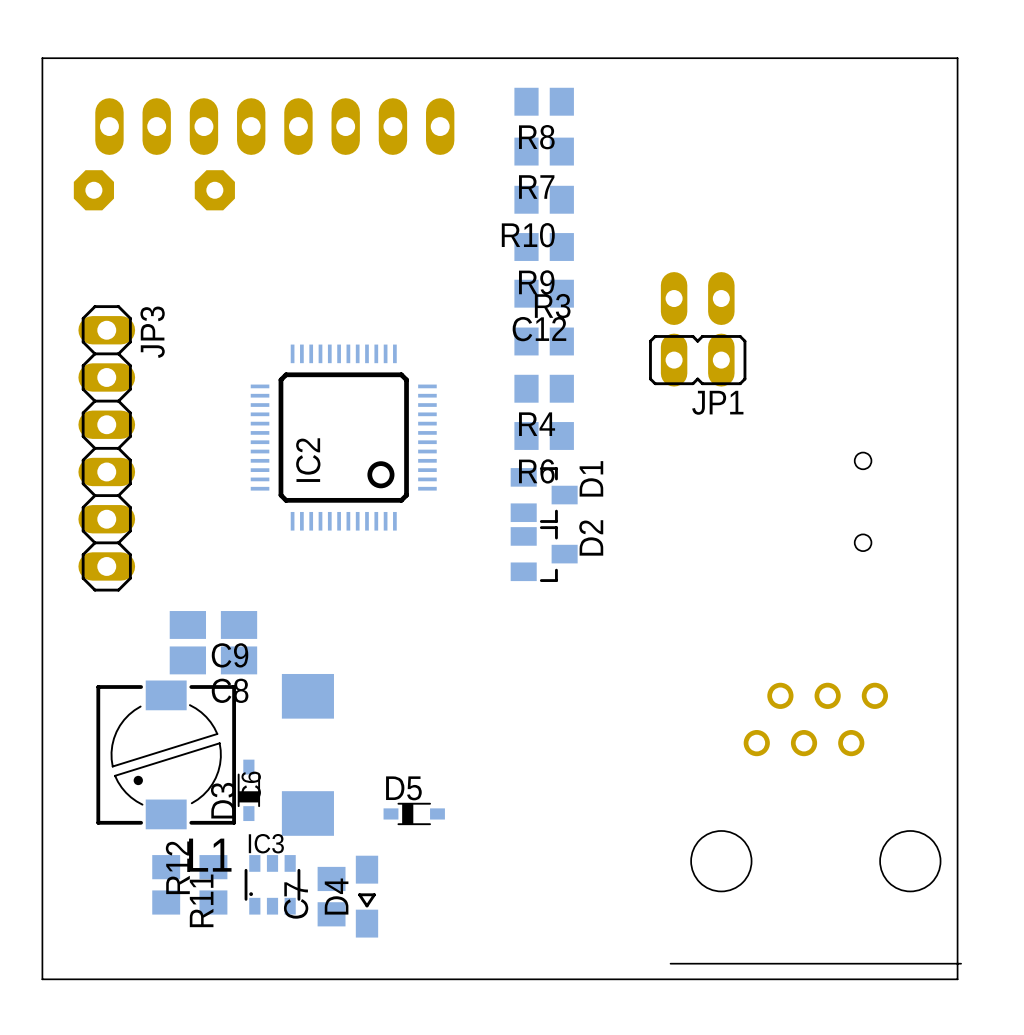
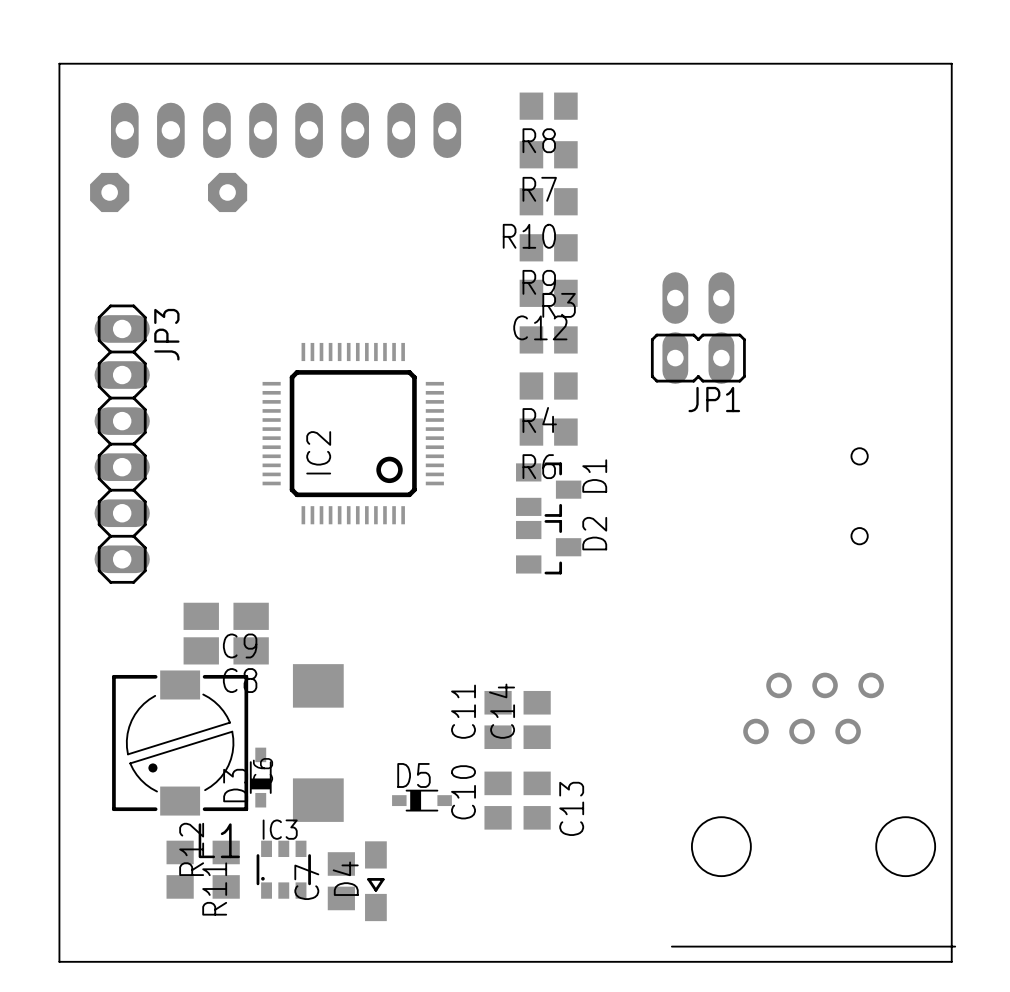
C11: none -> (498, 719)
C14: none -> (537, 719)
C10: none -> (498, 800)
C13: none -> (537, 800)

